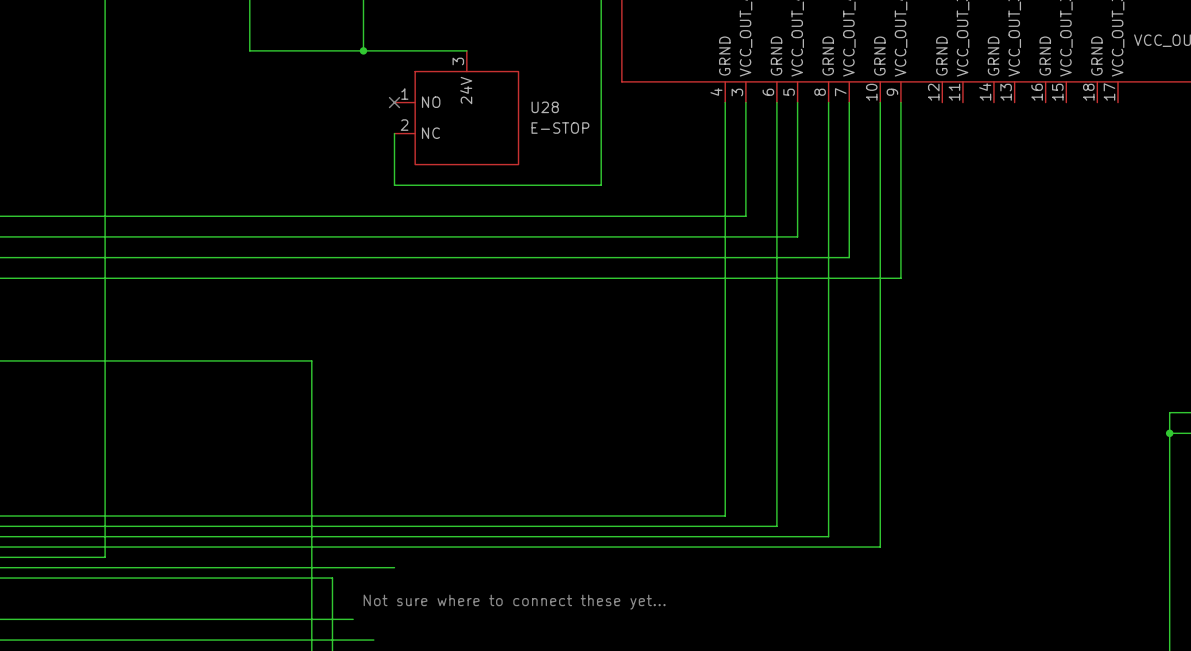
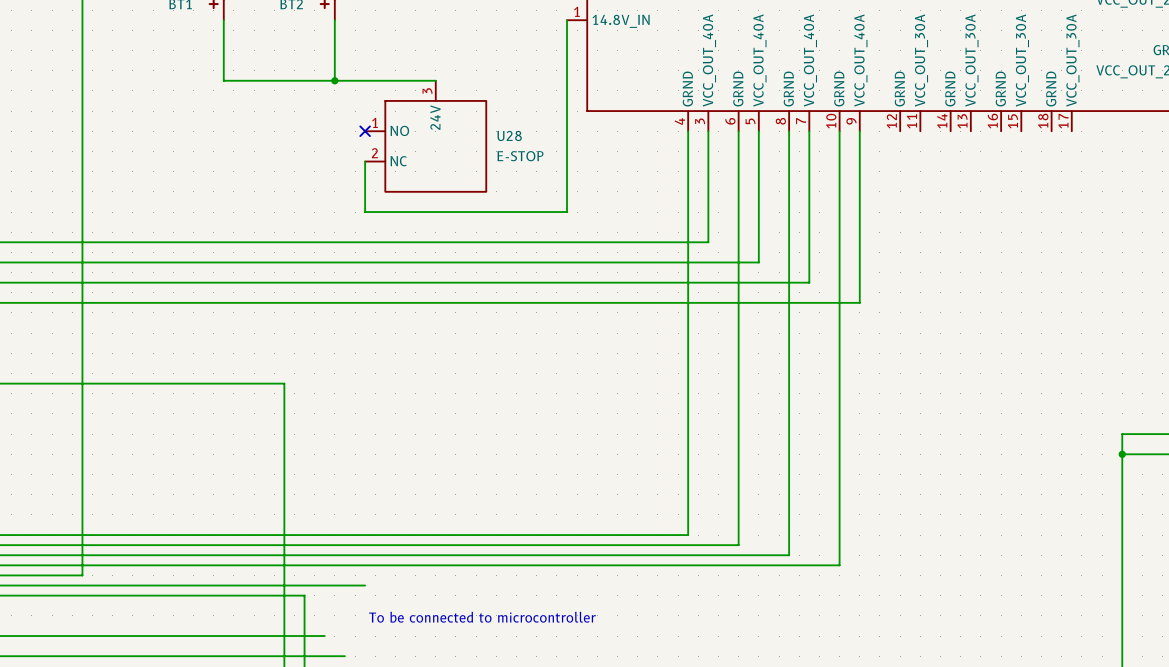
text: Not sure where to connect these yet... (514, 602) -> To be connected to microcontroller (482, 617)

